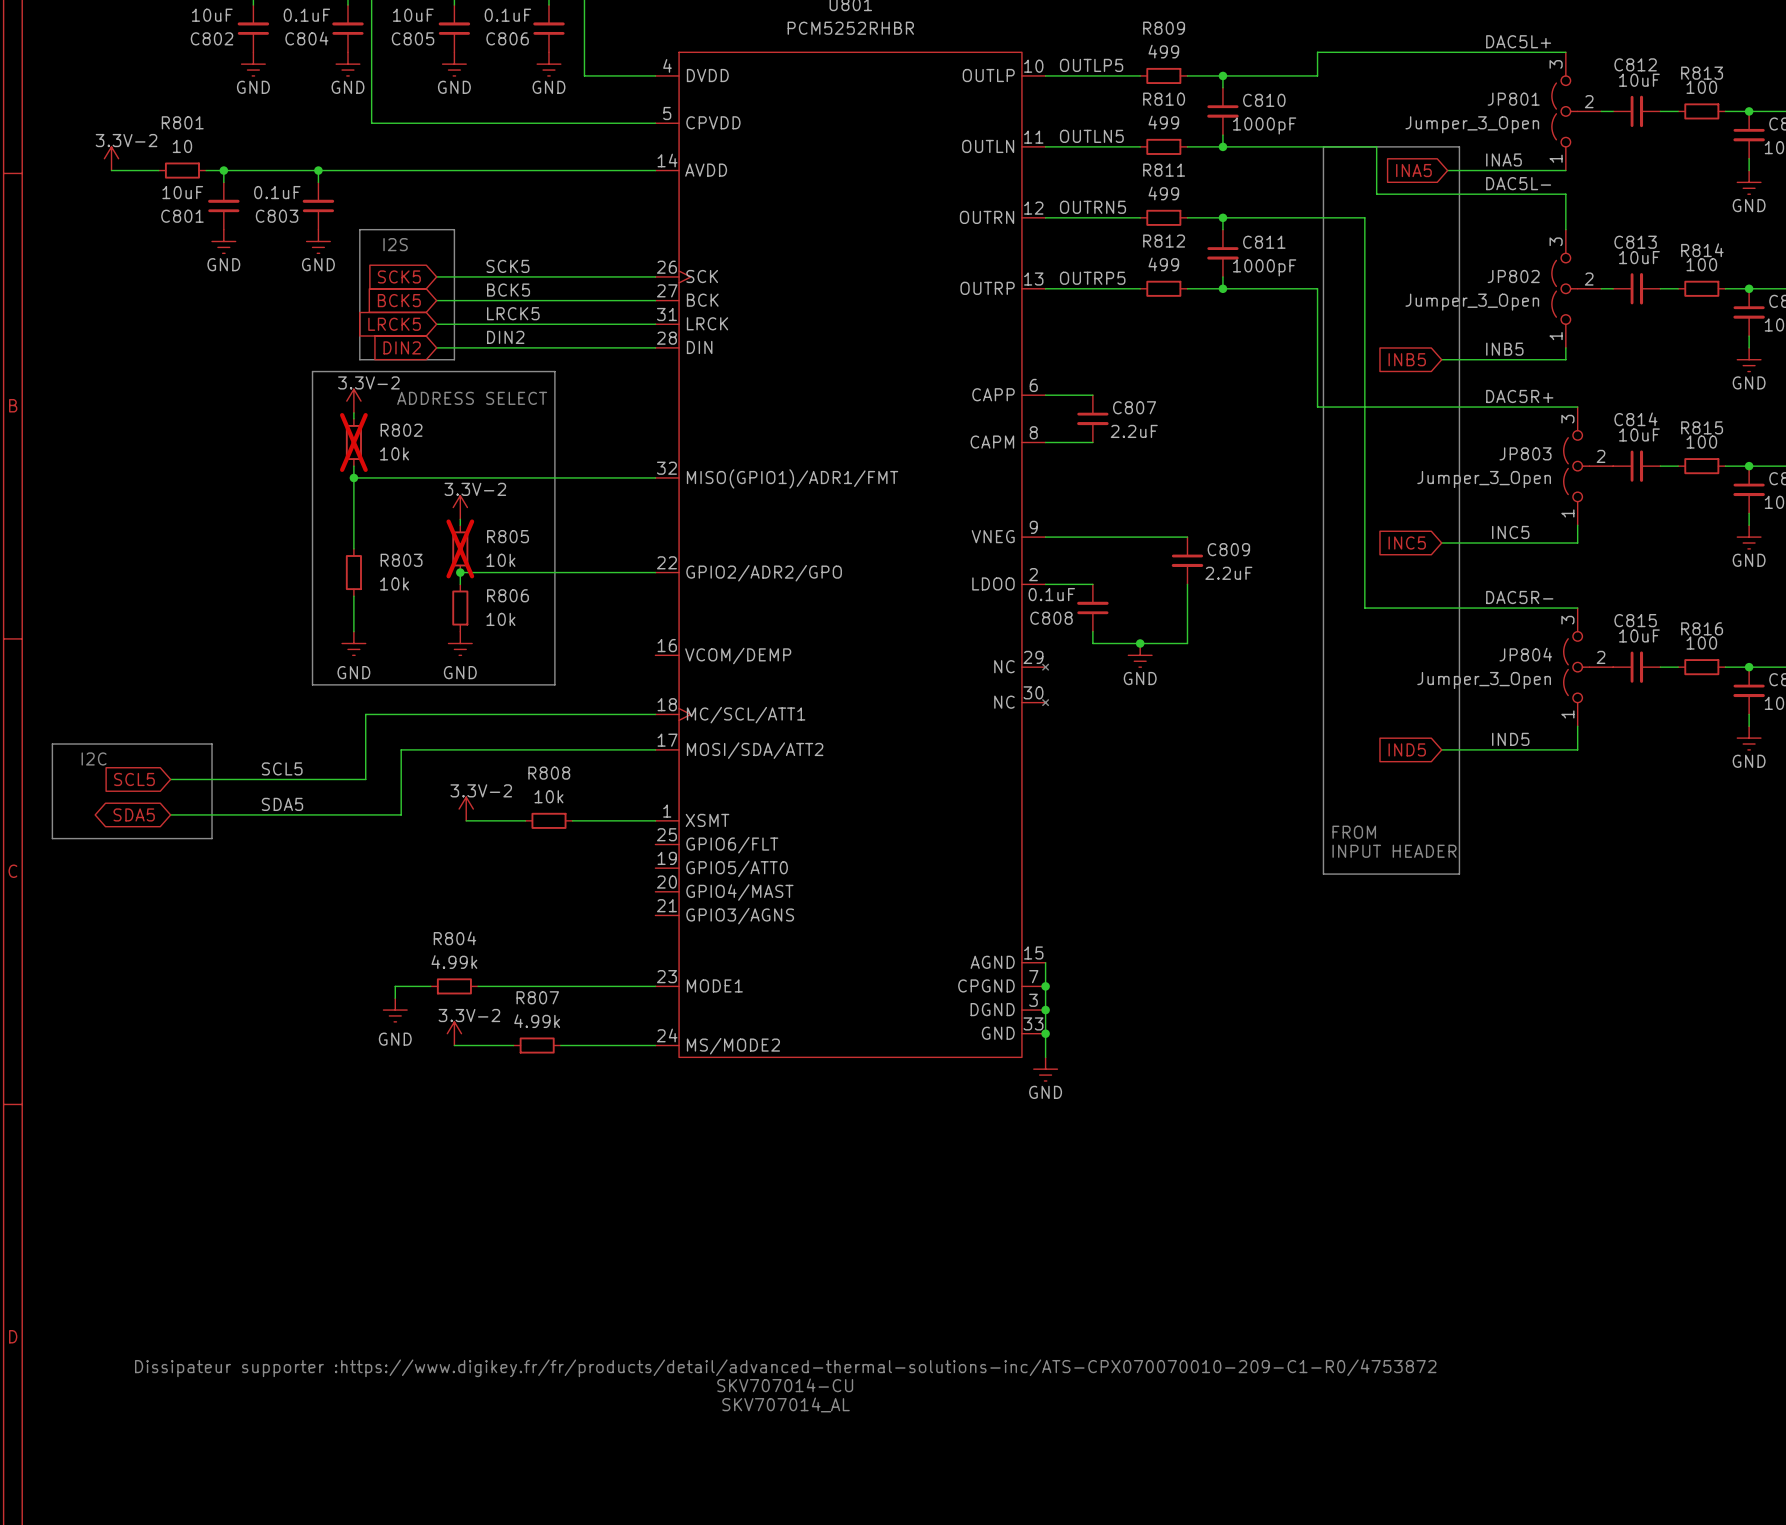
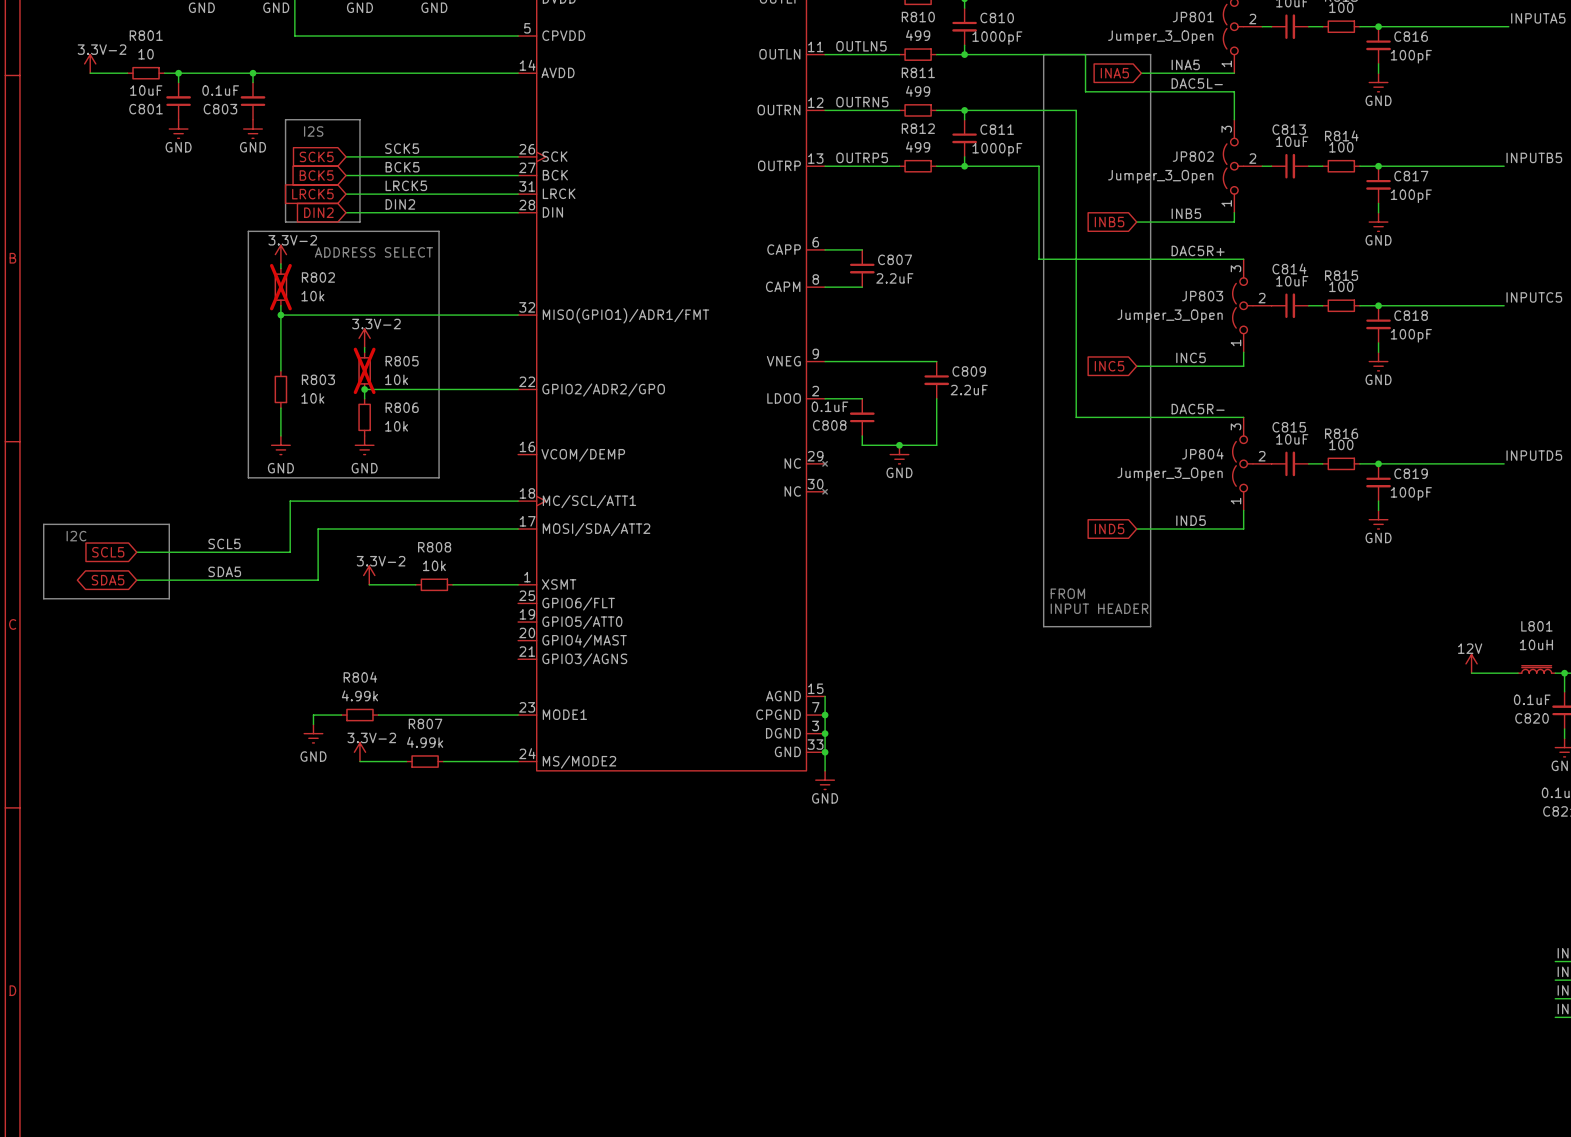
text: Dissipateur supporter :https://www.digikey.fr/fr/products/detail/advanced-thermal-solutions-inc/ATS-CPX070070010-209-C1-R0/4753872 (785, 1368) -> none
text: SKV707014-CU (785, 1385) -> none
text: SKV707014_AL (786, 1404) -> none

